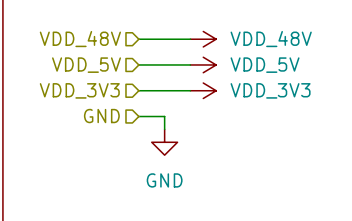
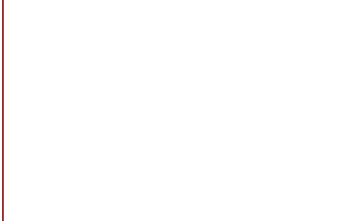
hierarchical label: VDD_48V (80, 39) -> none
wire: (138, 39) (190, 39) -> none
power symbol: VDD_48V (203, 39) -> none
wire: (138, 64) (190, 64) -> none
power symbol: VDD_5V (203, 64) -> none
hierarchical label: VDD_5V (86, 65) -> none
hierarchical label: VDD_3V3 (79, 90) -> none
wire: (138, 90) (190, 90) -> none
power symbol: VDD_3V3 (203, 90) -> none
hierarchical label: GND (101, 116) -> none
wire: (138, 116) (164, 116) (164, 129) -> none
power symbol: GND (164, 142) -> none

